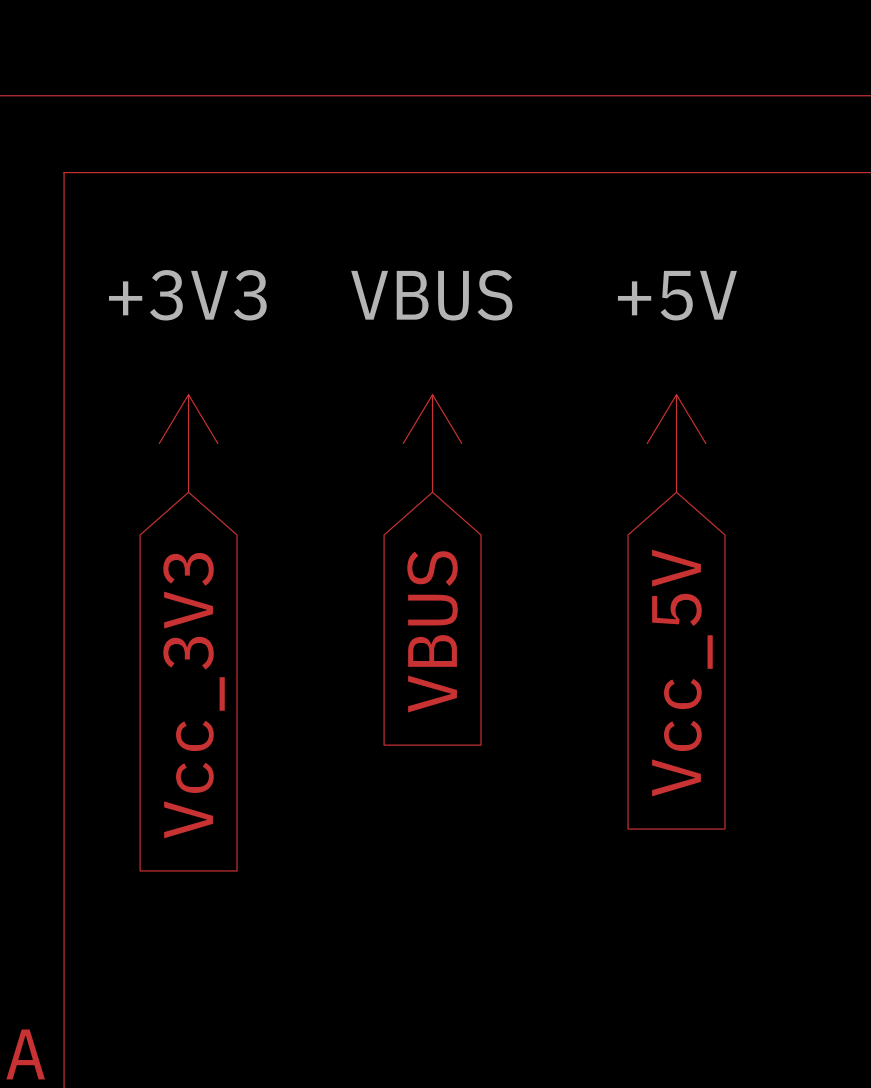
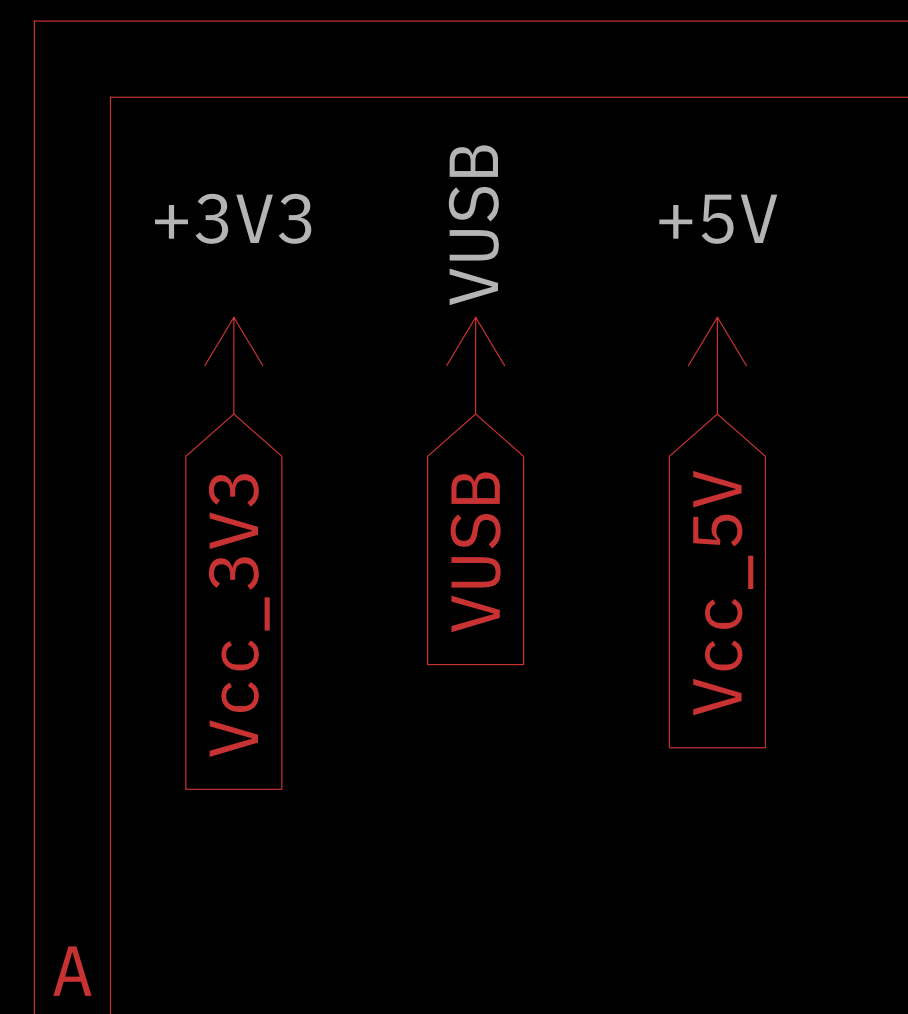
power symbol: VBUS (432, 443) -> VUSB (475, 365)
global label: VBUS (432, 631) -> VUSB (475, 552)

